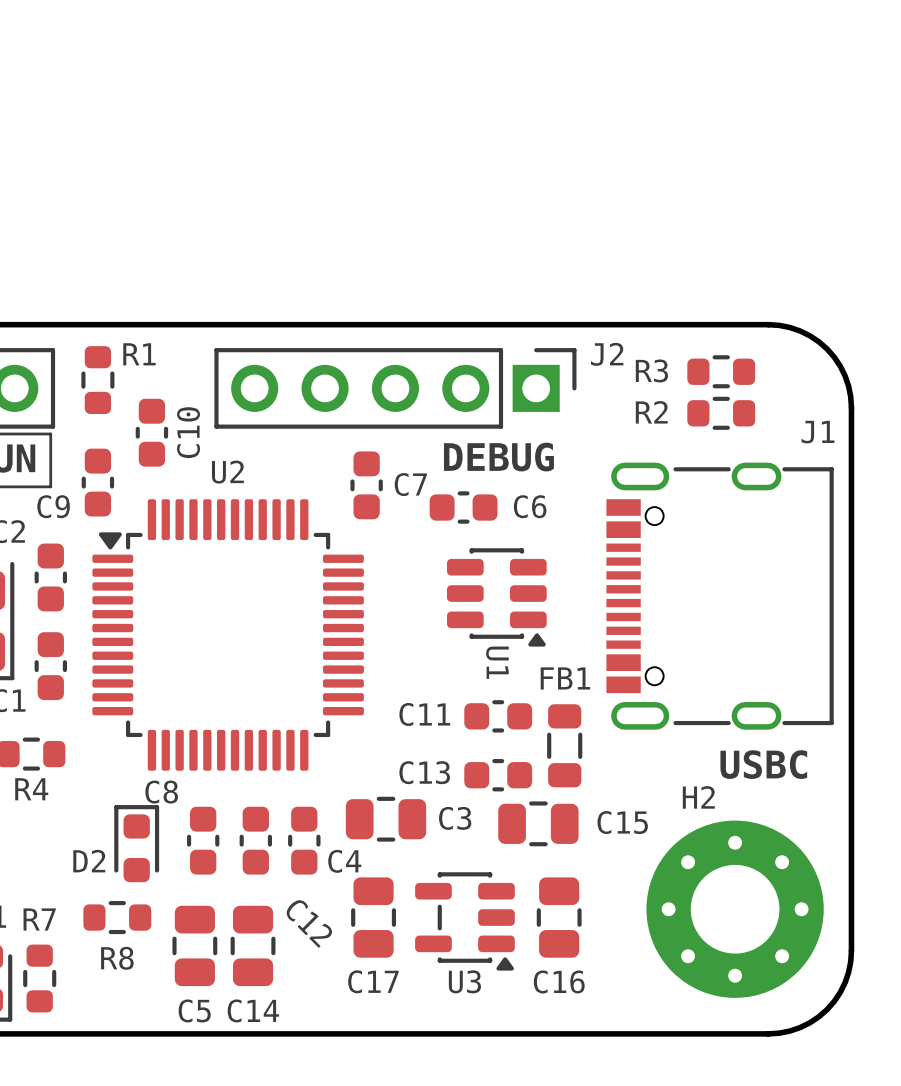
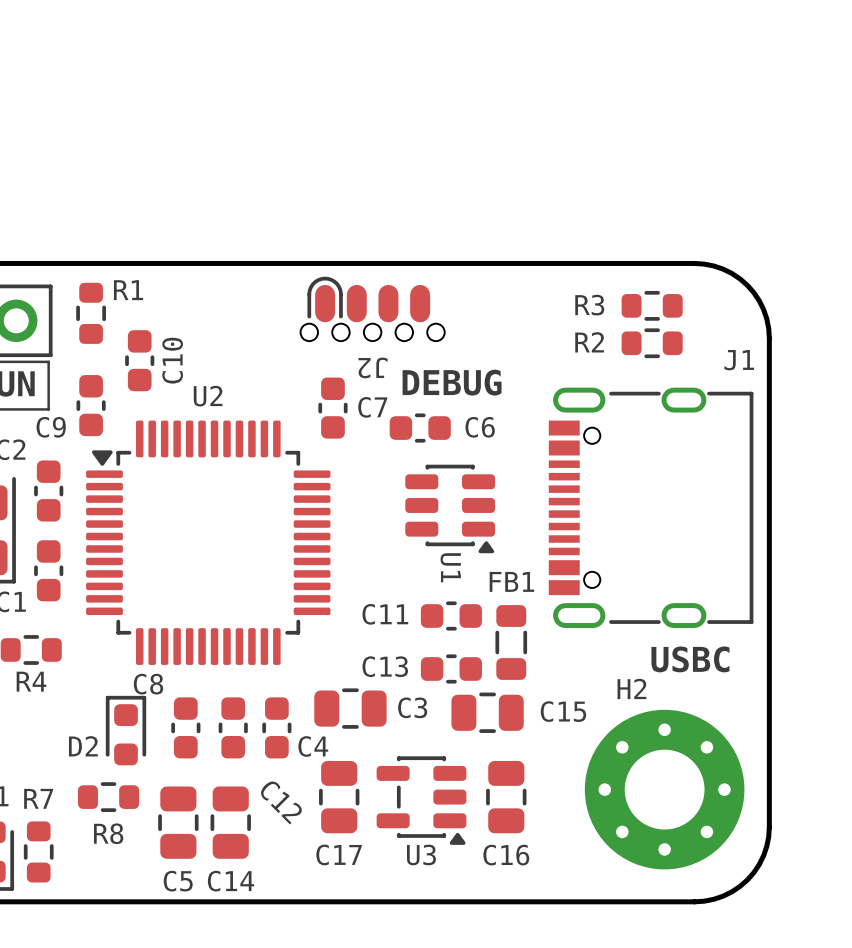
J2 footprint: [214, 348, 577, 429] -> [300, 276, 445, 342]
J2 name position: J2 (607, 354) -> J2 (373, 367)

